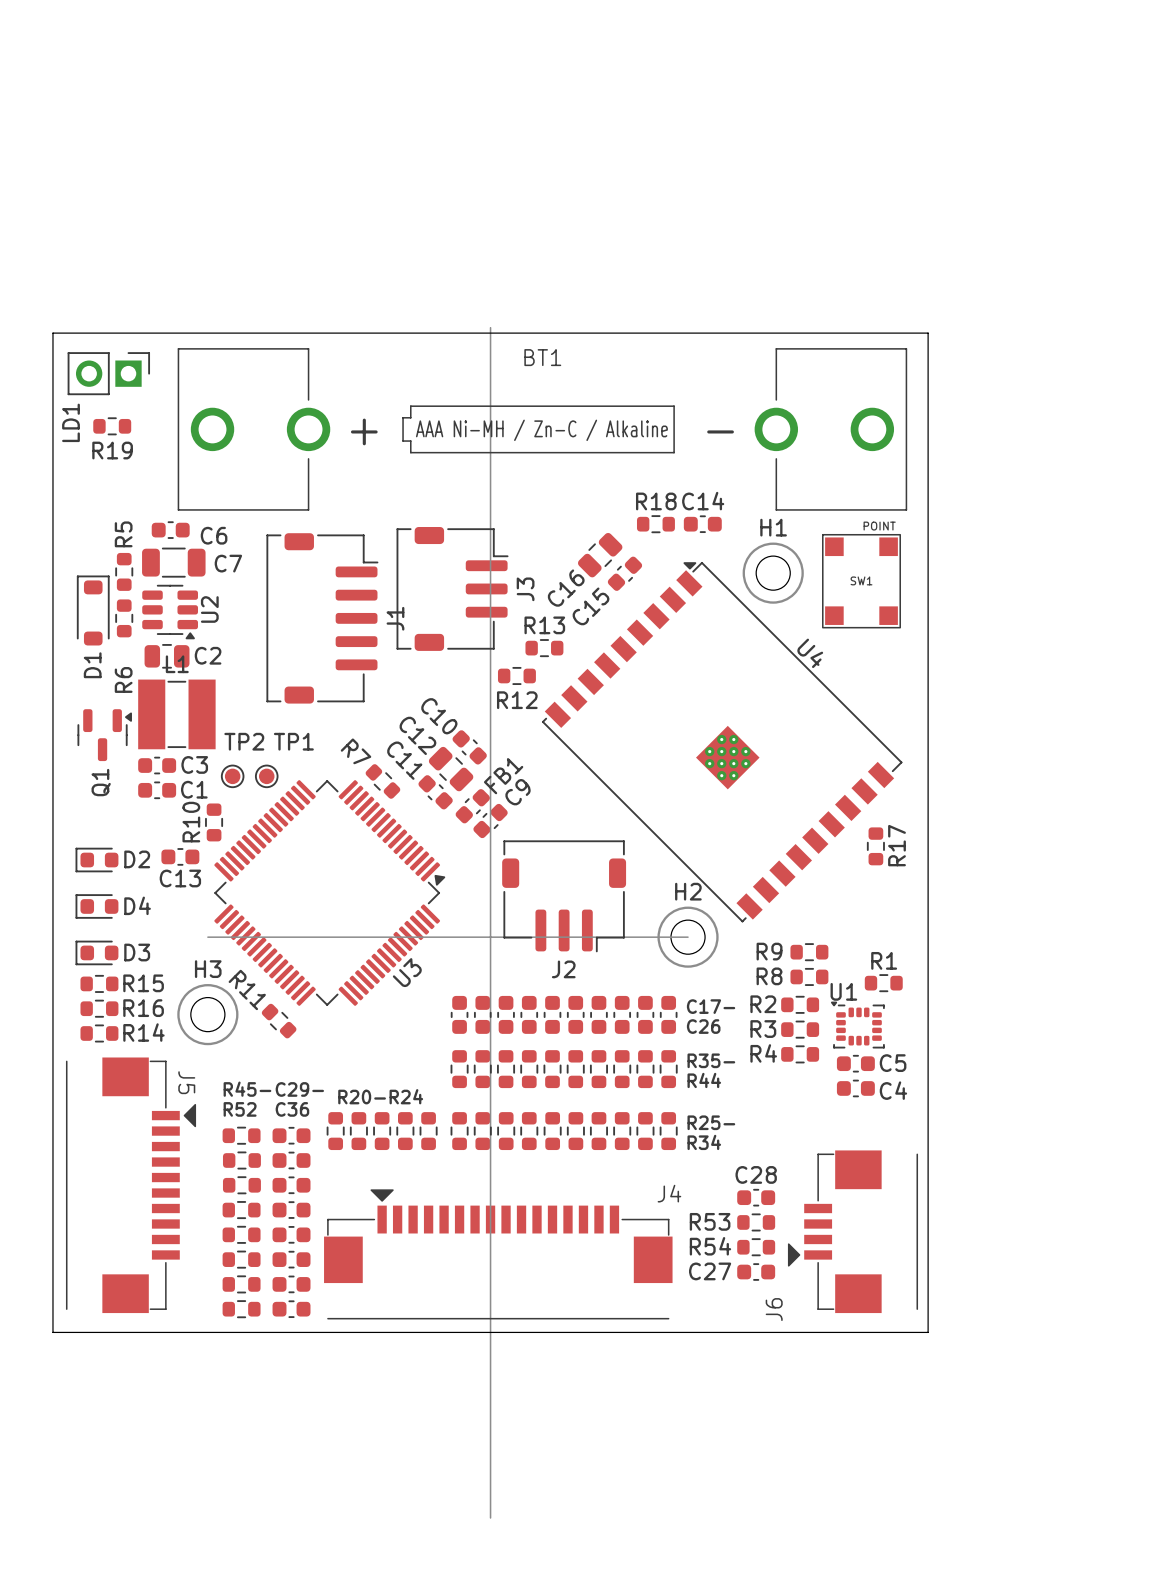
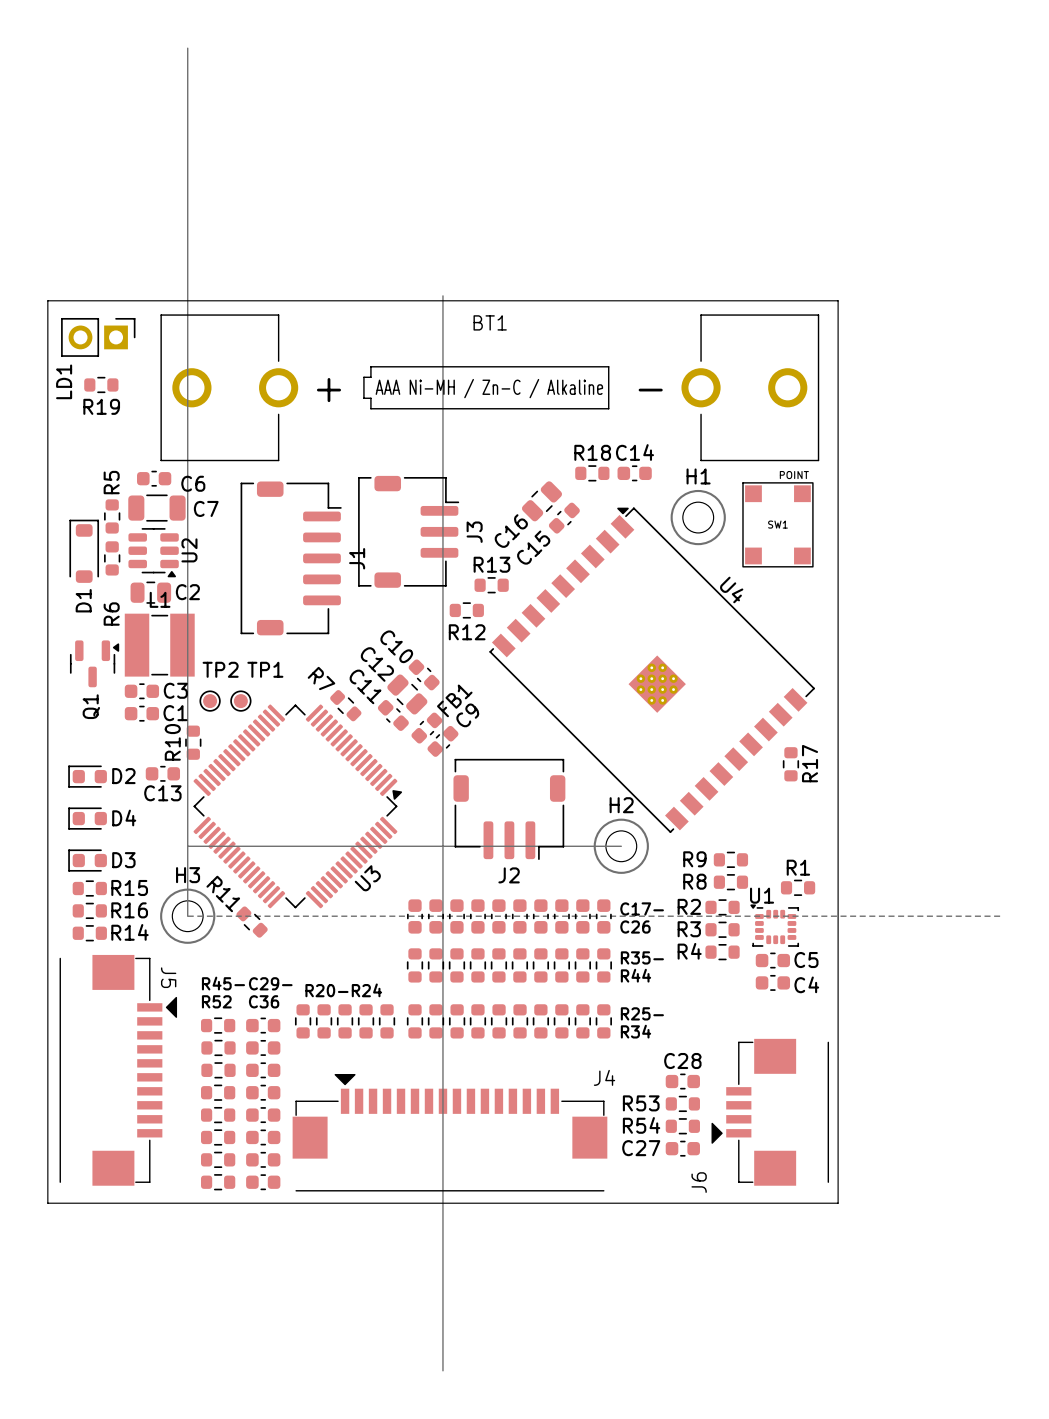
line: none -> (187, 48) (187, 916) (1000, 916)

